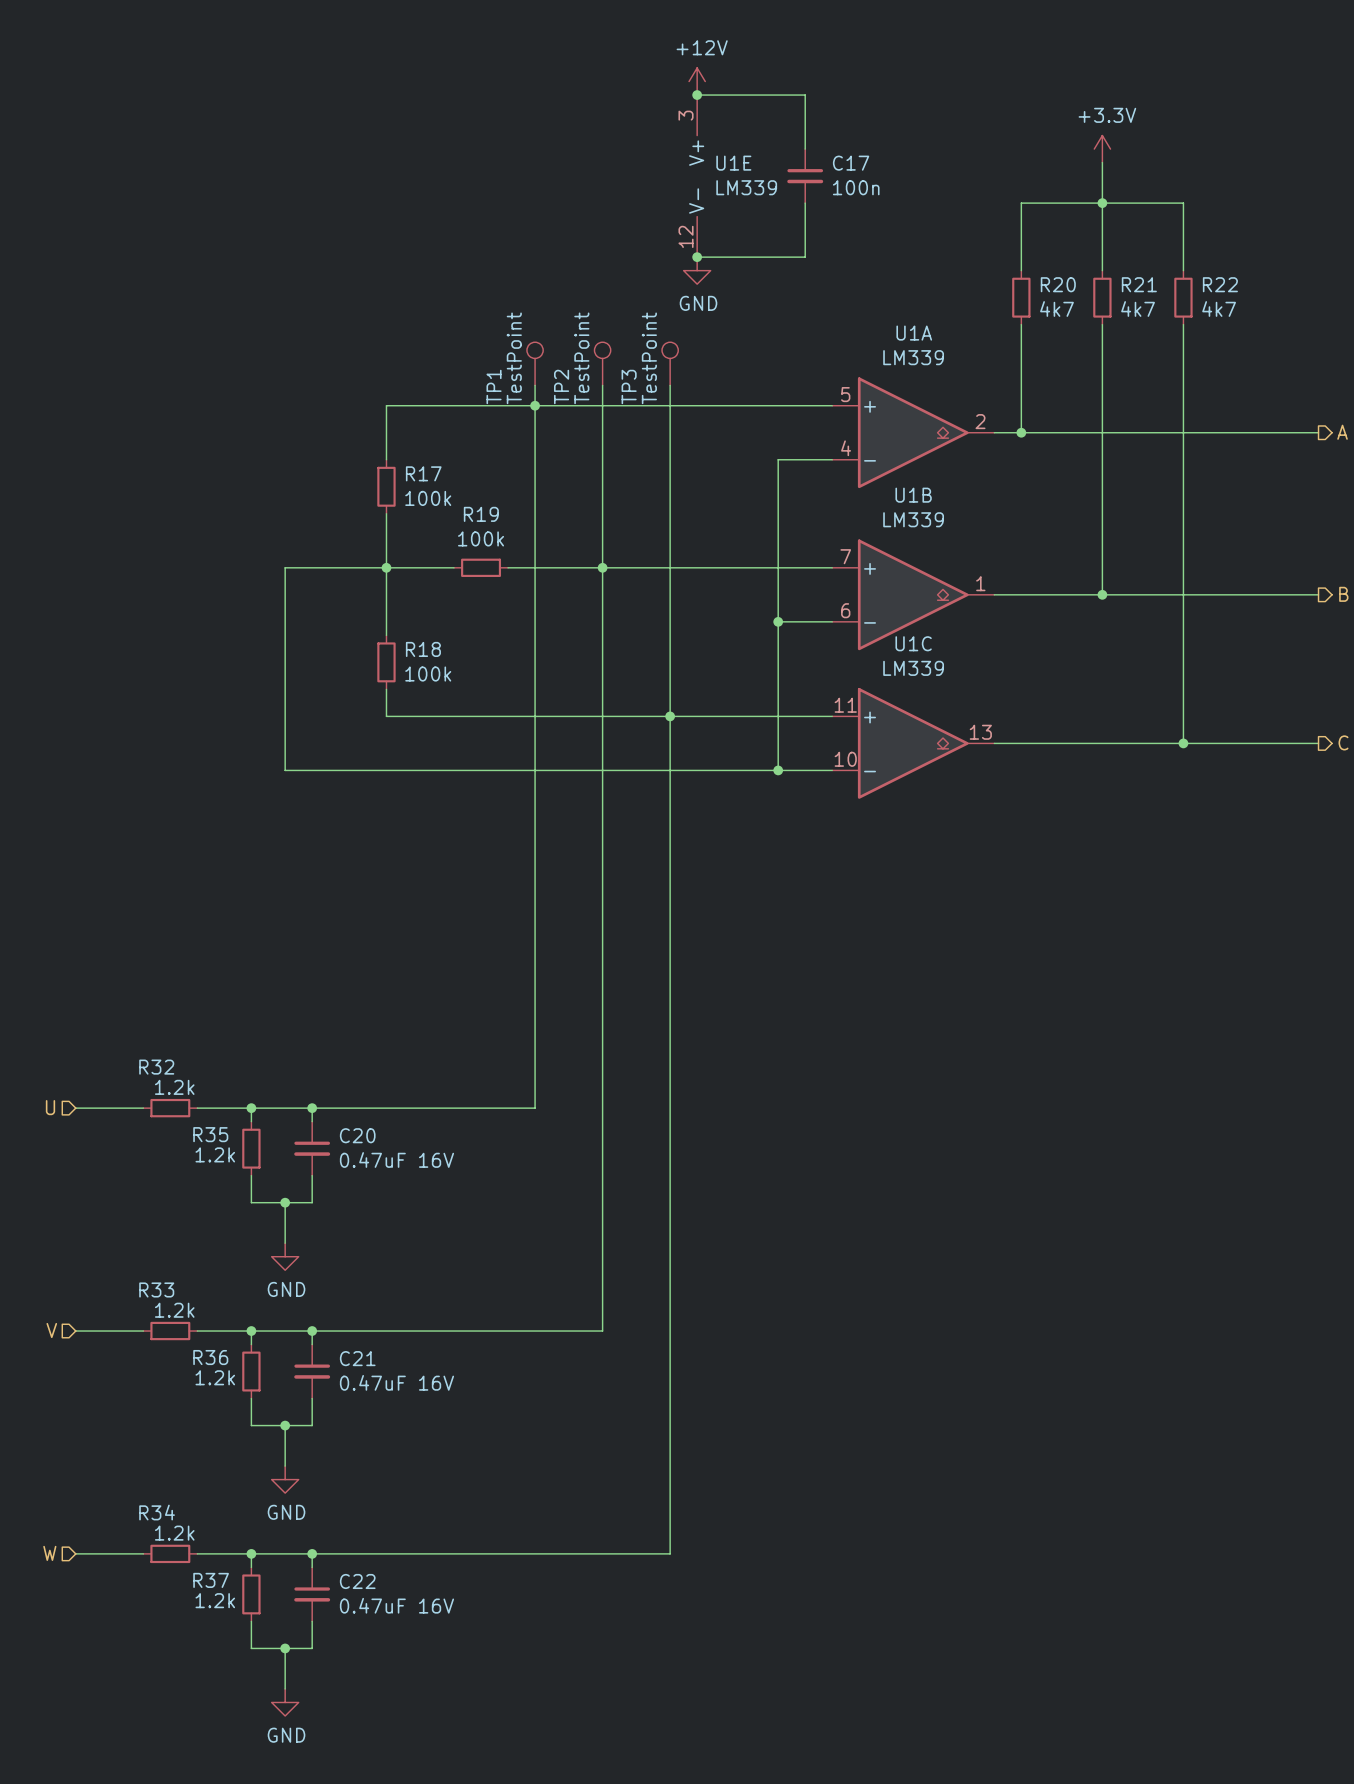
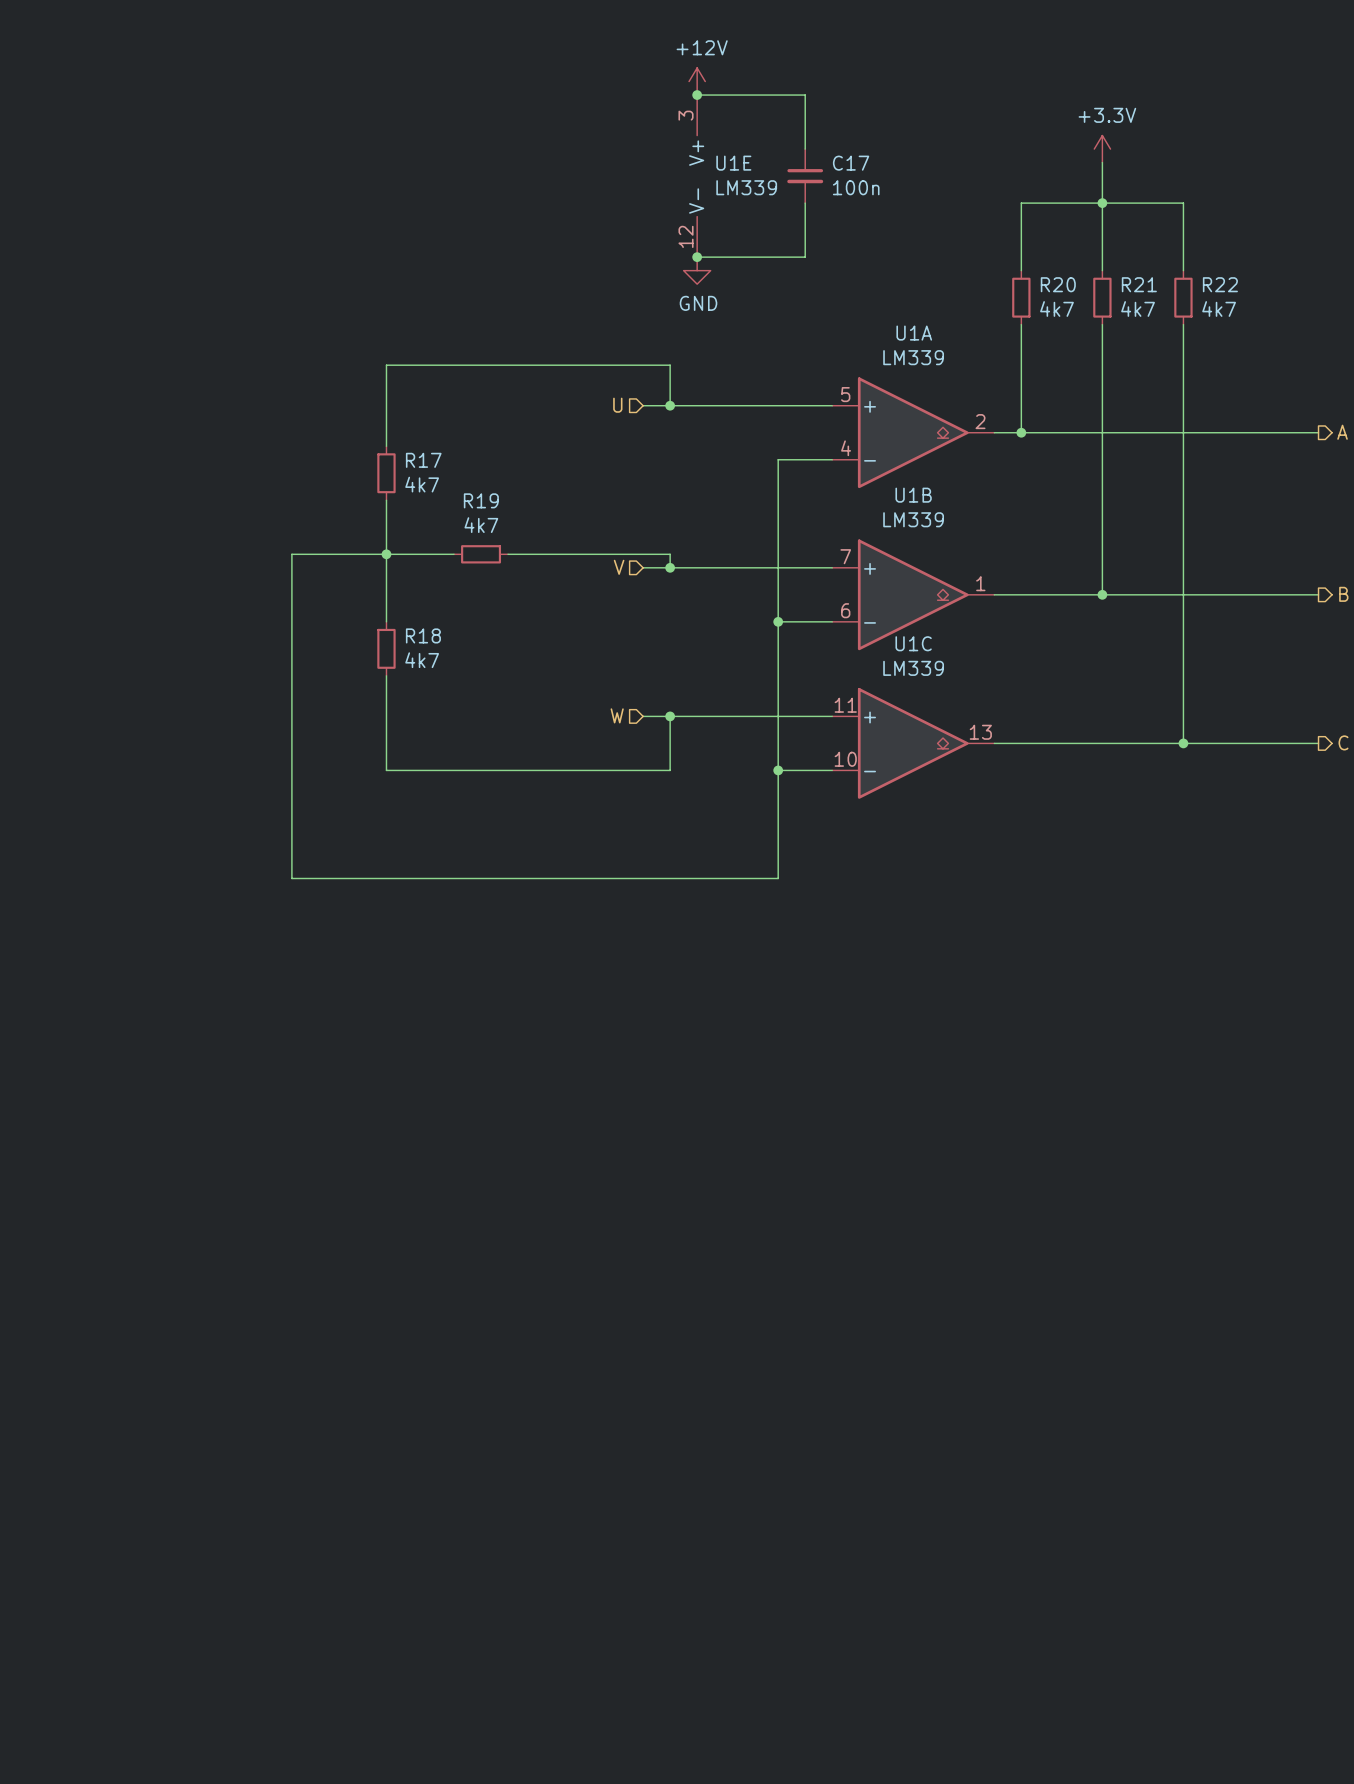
TP1: TestPoint (535, 363) -> none
TP2: TestPoint (602, 363) -> none
TP3: TestPoint (670, 363) -> none
wire: (535, 385) (535, 1108) (197, 1108) -> none
wire: (602, 385) (602, 1331) (197, 1331) -> none
wire: (386, 405) (643, 405) -> (386, 405) (386, 365) (670, 365) (670, 385)
junction: (535, 405) -> none
hierarchical label: none -> U (617, 405)
wire: (670, 405) (670, 554) -> (508, 554) (670, 554)
junction: none -> (670, 405)
R17 position: (386, 486) -> (386, 473)
R17 value: 100k (428, 498) -> 4k7 (422, 484)
R19 value: 100k (481, 538) -> 4k7 (481, 525)
junction position: (386, 567) -> (386, 554)
wire: (454, 567) (285, 567) (285, 770) (386, 770) -> (386, 716) (386, 770)
R19 position: (481, 567) -> (481, 554)
wire: (508, 567) (643, 567) -> none
junction: (602, 567) -> none
hierarchical label: none -> V (619, 567)
wire: (670, 567) (670, 716) -> none
junction: none -> (670, 567)
R18 position: (386, 662) -> (386, 648)
R18 value: 100k (428, 674) -> 4k7 (422, 660)
hierarchical label: none -> W (617, 715)
wire: (386, 716) (643, 716) -> none
wire: (778, 770) (670, 770) (670, 1553) (197, 1553) -> (778, 770) (778, 878) (291, 878) (291, 554) (454, 554)
hierarchical label: U (50, 1107) -> none
wire: (75, 1108) (143, 1108) -> none
R32: 1.2k (170, 1108) -> none
wire: (251, 1108) (251, 1121) -> none
junction: (251, 1108) -> none
wire: (312, 1108) (312, 1121) -> none
junction: (312, 1108) -> none
R35: 1.2k (251, 1148) -> none
C20: 0.47uF 16V (312, 1148) -> none
wire: (251, 1175) (251, 1202) (312, 1202) (312, 1175) -> none
wire: (285, 1202) (285, 1243) -> none
junction: (285, 1202) -> none
power symbol: GND (285, 1256) -> none
hierarchical label: V (51, 1330) -> none
wire: (75, 1331) (143, 1331) -> none
R33: 1.2k (170, 1331) -> none
wire: (251, 1331) (251, 1344) -> none
junction: (251, 1331) -> none
wire: (312, 1331) (312, 1344) -> none
junction: (312, 1331) -> none
R36: 1.2k (251, 1371) -> none
C21: 0.47uF 16V (312, 1371) -> none
wire: (251, 1398) (251, 1425) (312, 1425) (312, 1398) -> none
wire: (285, 1425) (285, 1466) -> none
junction: (285, 1425) -> none
power symbol: GND (285, 1479) -> none
hierarchical label: W (49, 1553) -> none
wire: (75, 1553) (143, 1553) -> none
R34: 1.2k (170, 1553) -> none
wire: (251, 1553) (251, 1567) -> none
junction: (251, 1553) -> none
wire: (312, 1553) (312, 1567) -> none
junction: (312, 1553) -> none
R37: 1.2k (251, 1594) -> none
C22: 0.47uF 16V (312, 1594) -> none
wire: (251, 1621) (251, 1648) (312, 1648) (312, 1621) -> none
wire: (285, 1648) (285, 1688) -> none
junction: (285, 1648) -> none
power symbol: GND (285, 1702) -> none

